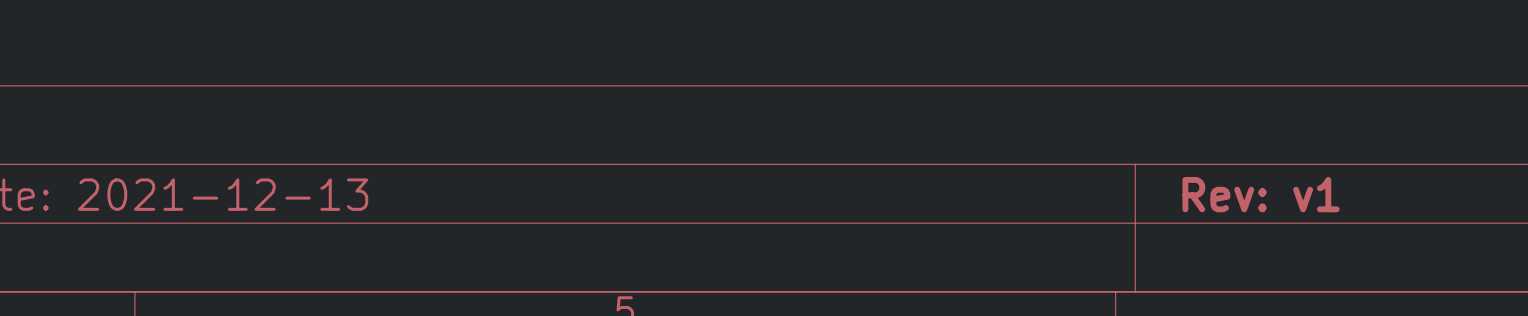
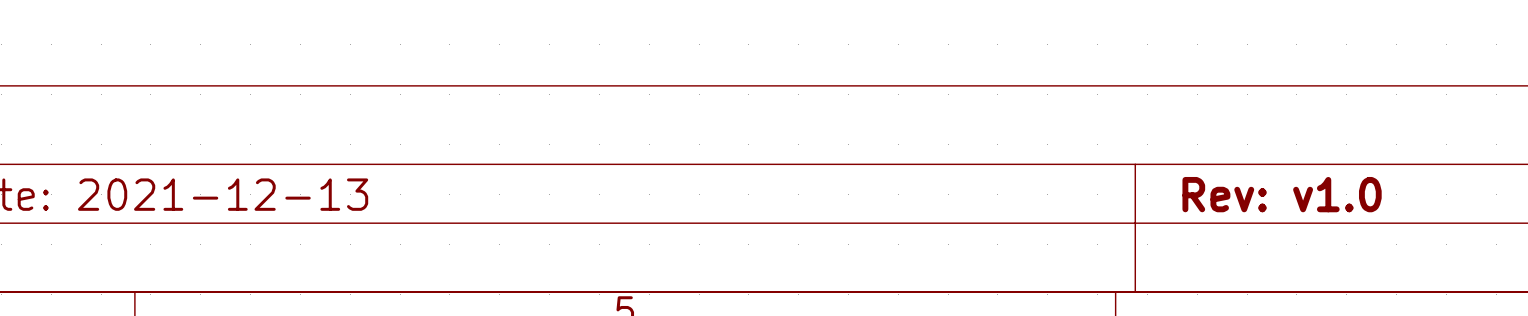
title block: Rev: v1 (1261, 194) -> Rev: v1.0 (1282, 194)

